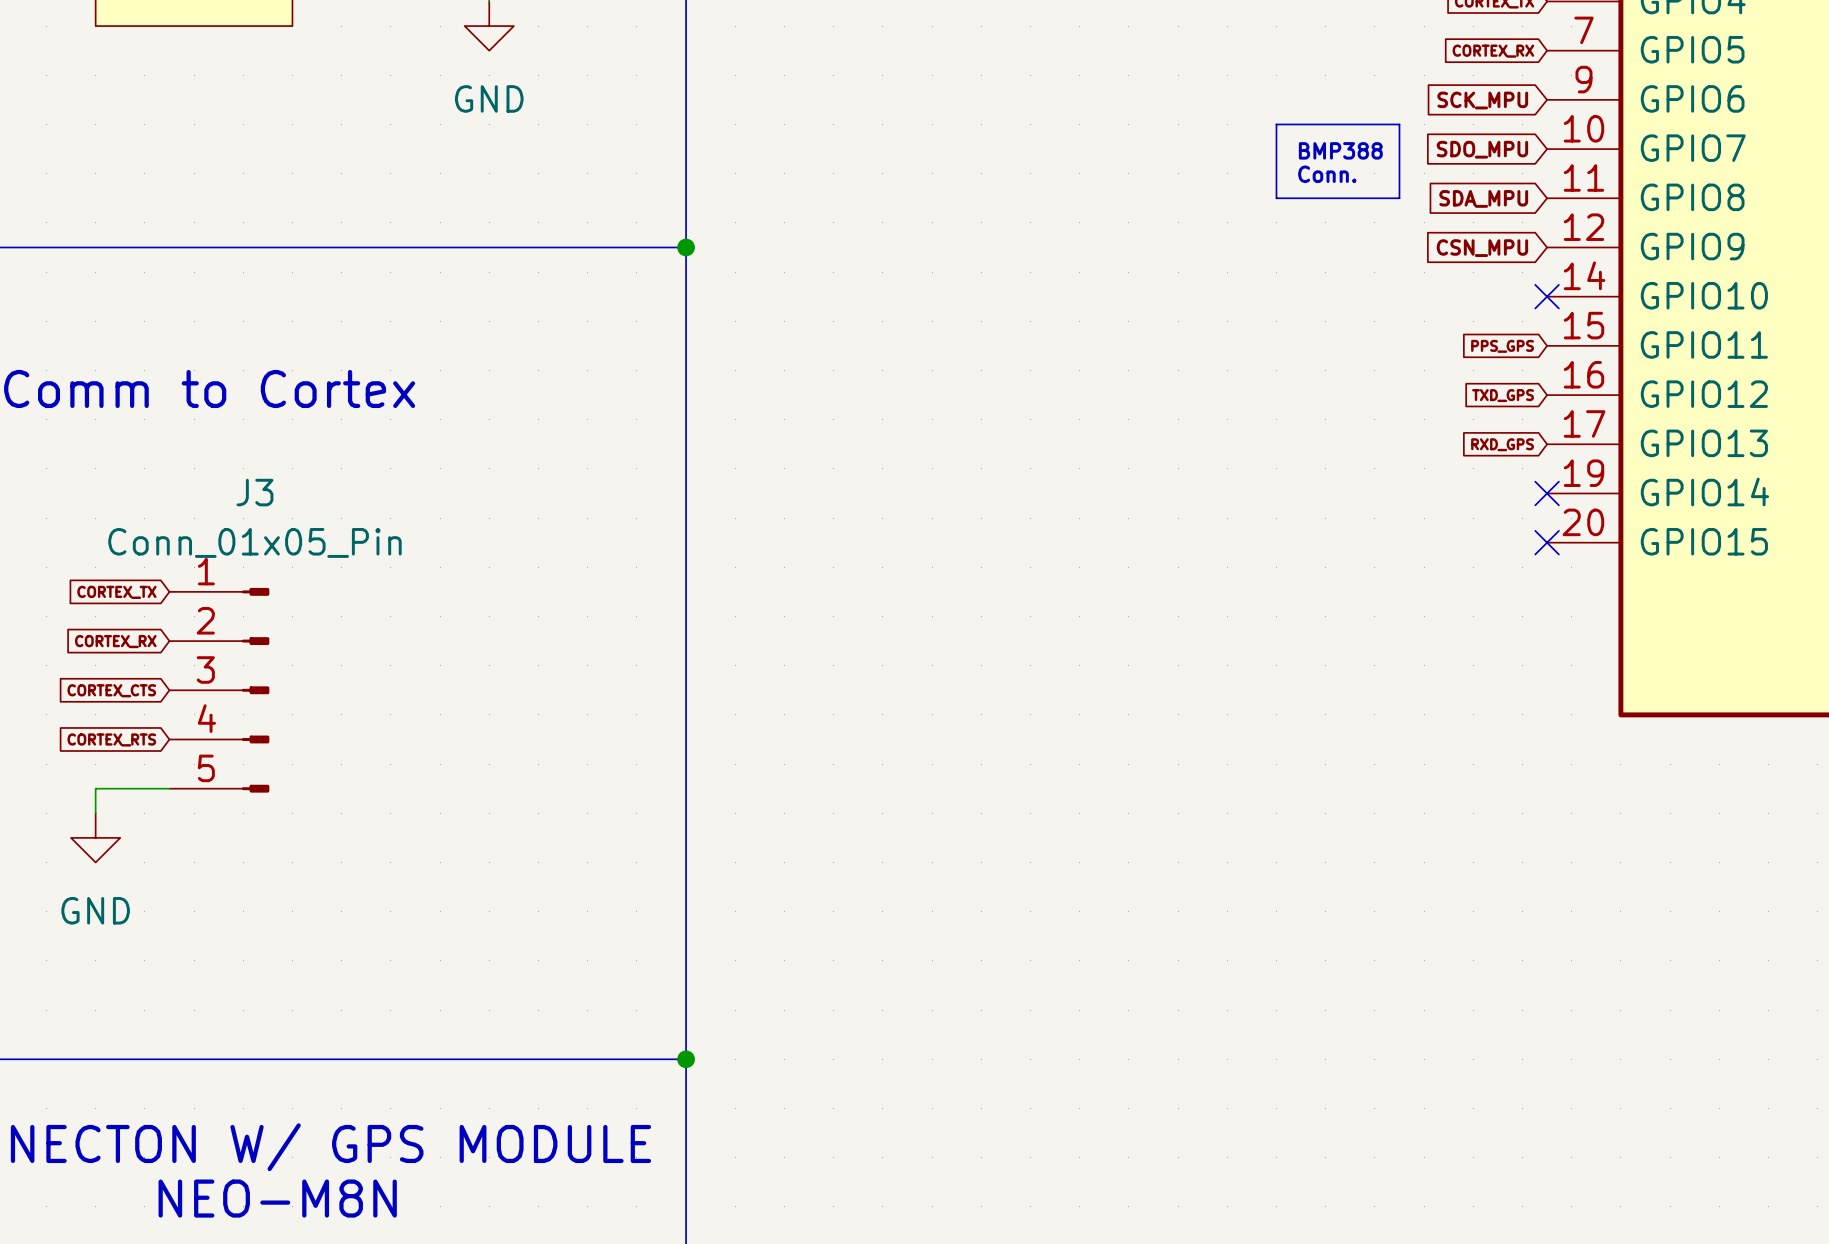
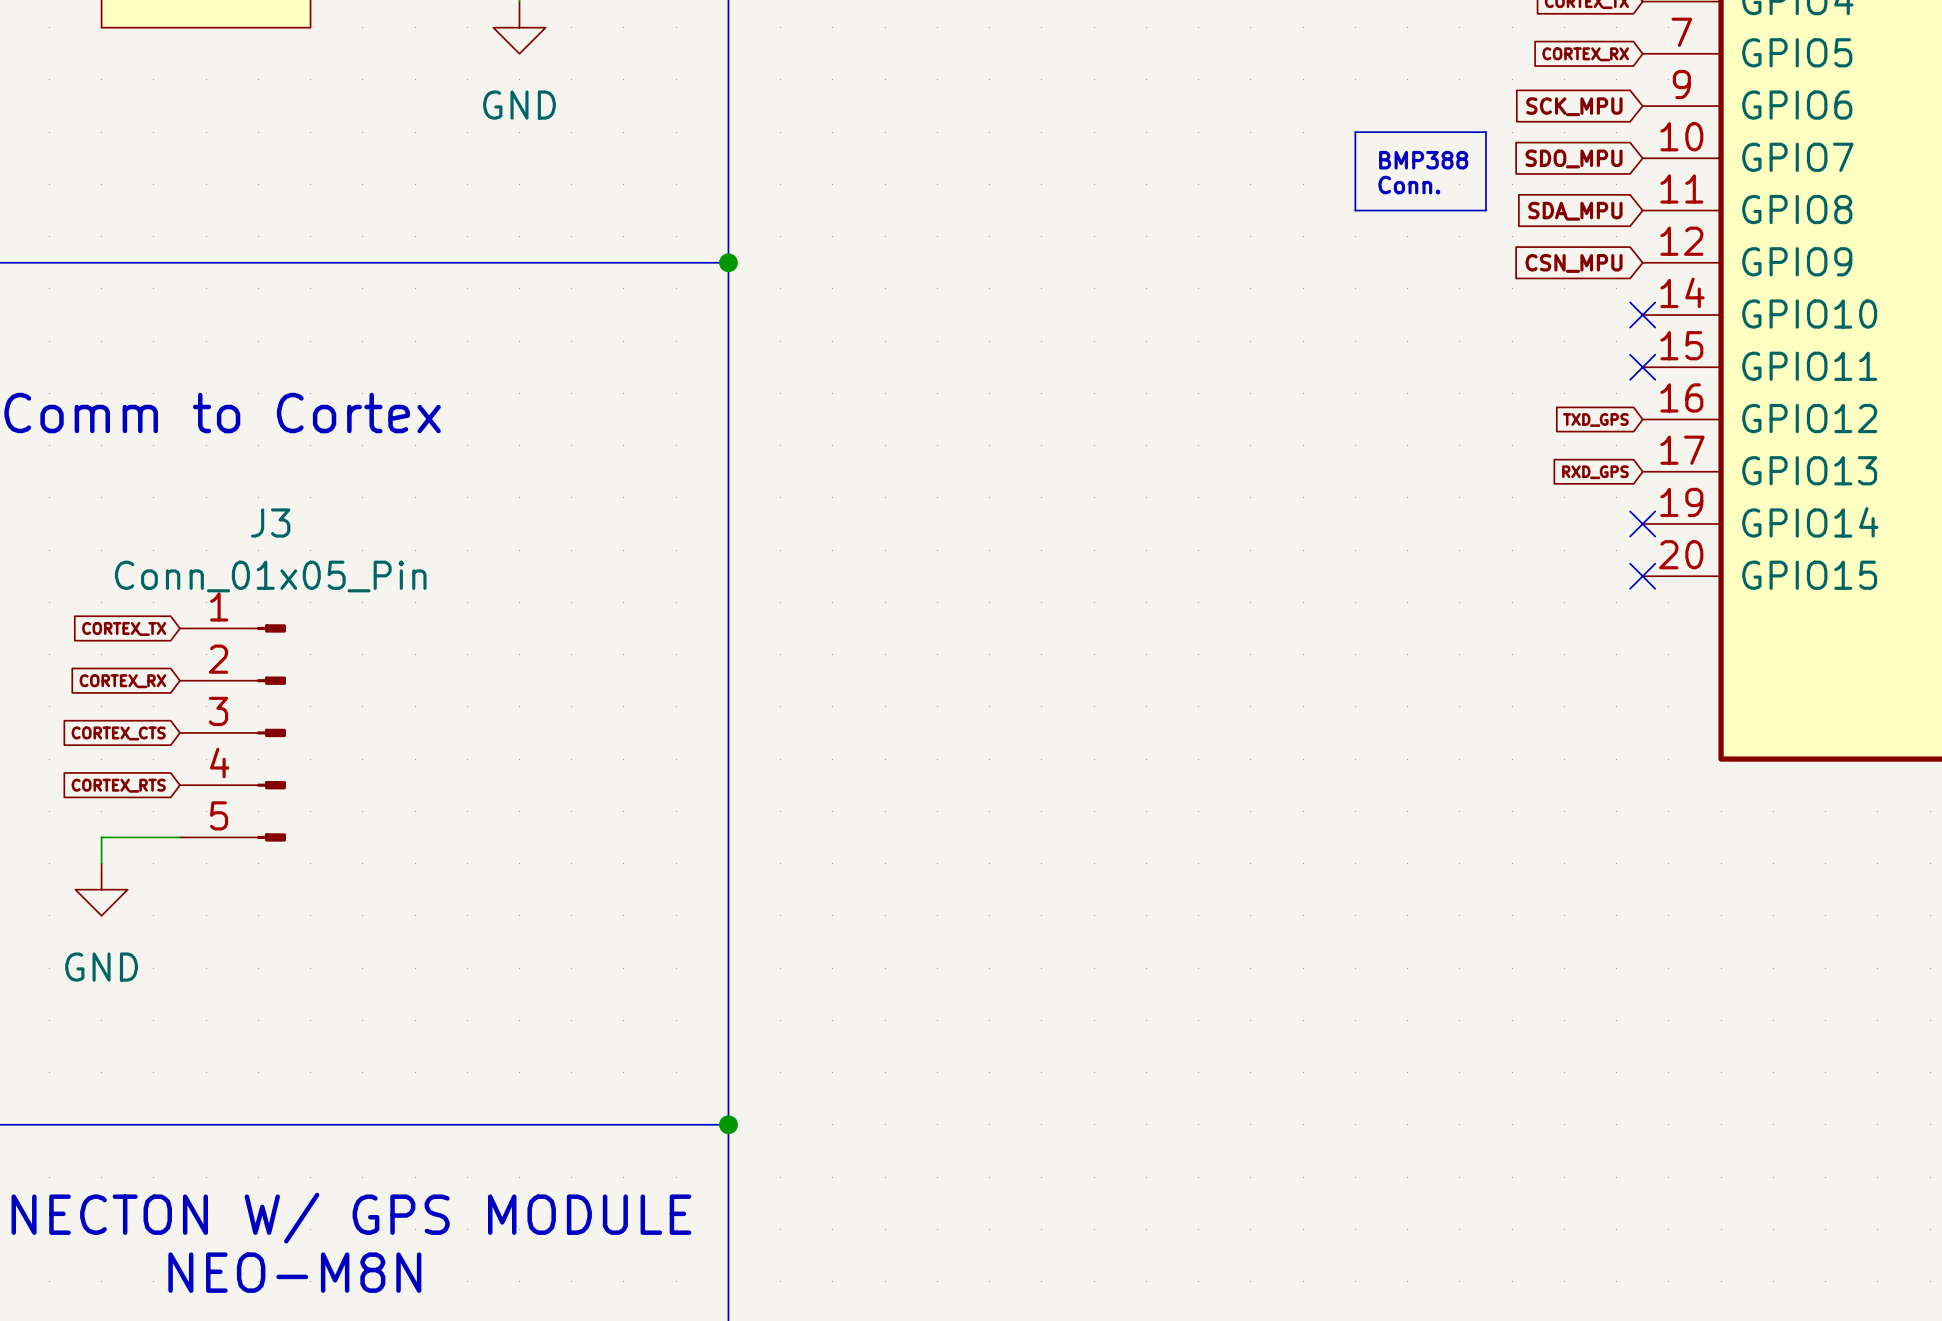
no-connect mark: none -> (1642, 367)
global label: PPS_GPS (1502, 346) -> none

